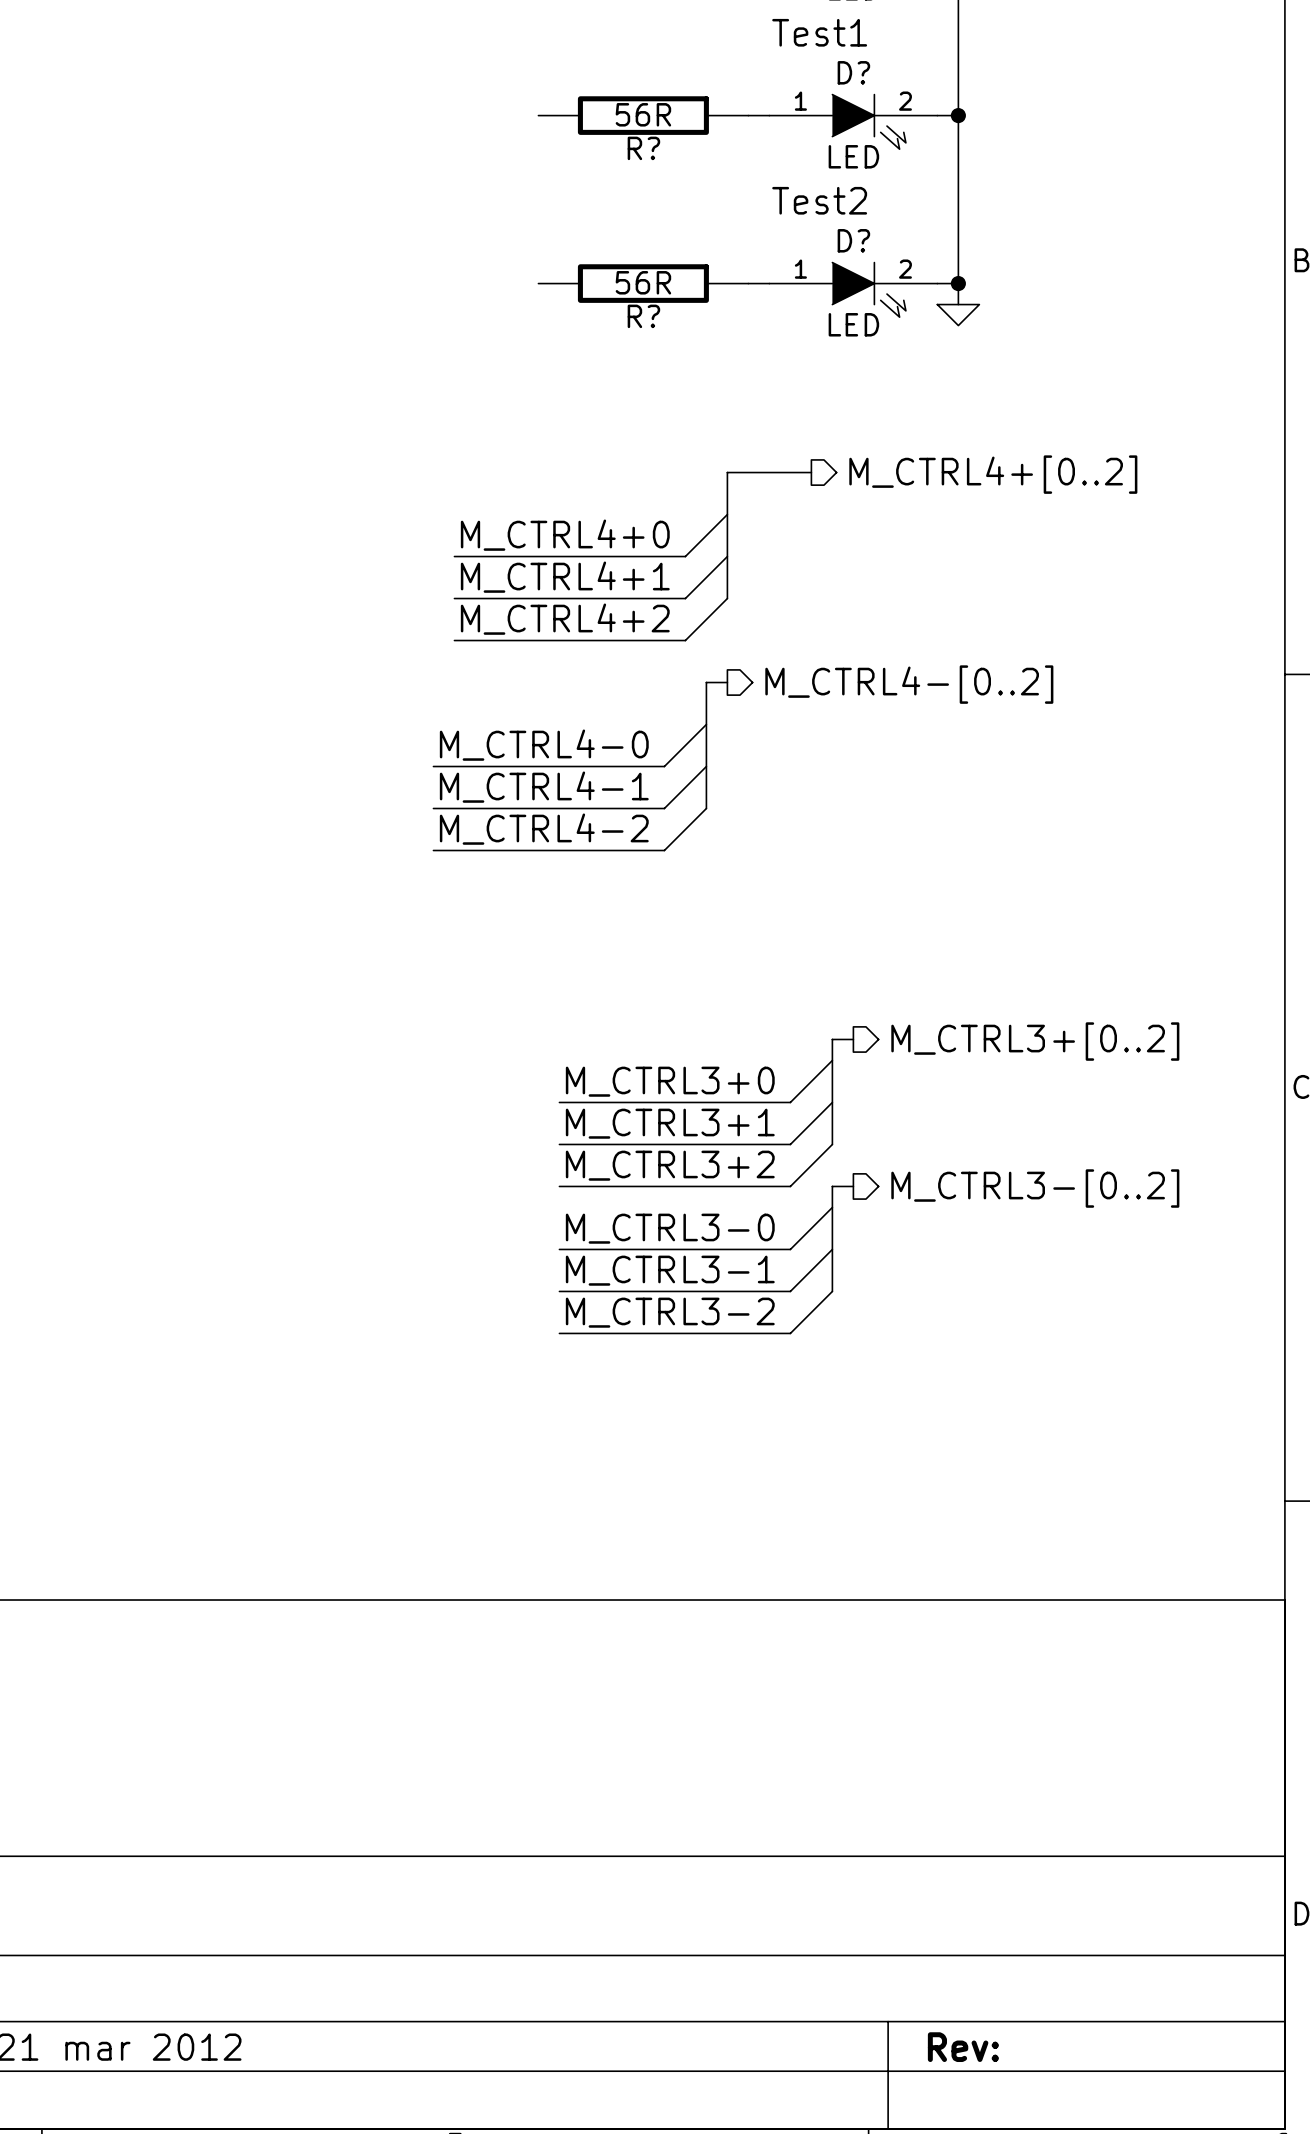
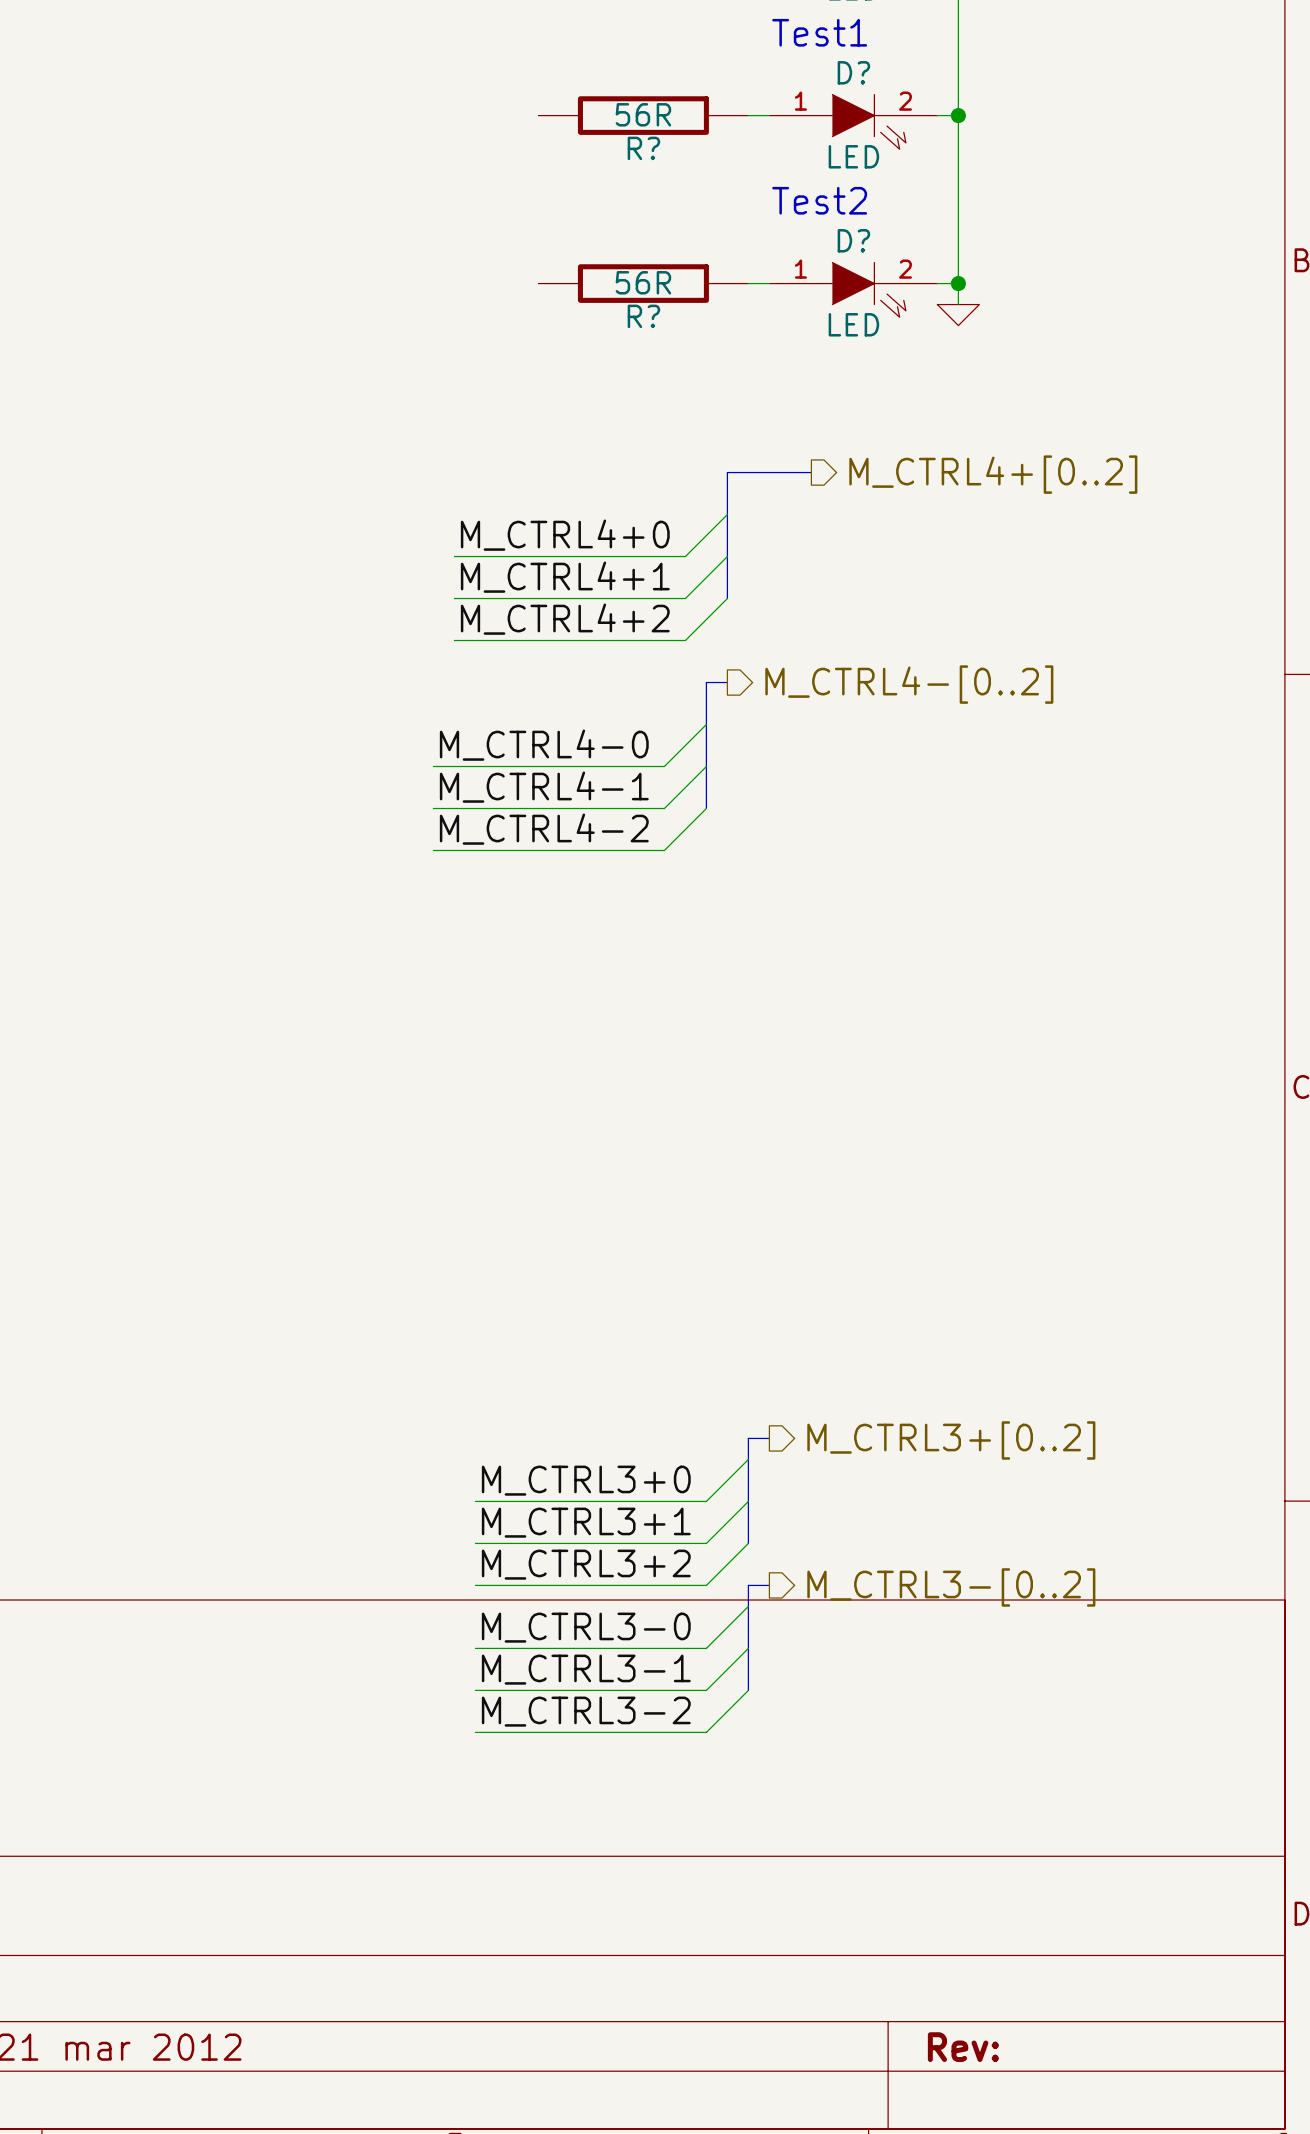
bus: (853, 1039) (832, 1039) (832, 1144) -> (769, 1438) (748, 1438) (748, 1543)
hierarchical label position: M_CTRL3+[0..2] (1035, 1041) -> M_CTRL3+[0..2] (951, 1440)
wire: (832, 1060) (790, 1102) (559, 1102) -> (748, 1459) (706, 1501) (475, 1501)
label position: M_CTRL3+0 (670, 1081) -> M_CTRL3+0 (586, 1480)
wire: (832, 1102) (790, 1144) (559, 1144) -> (748, 1501) (706, 1543) (475, 1543)
label position: M_CTRL3+1 (670, 1123) -> M_CTRL3+1 (586, 1522)
wire: (832, 1144) (790, 1186) (559, 1186) -> (748, 1543) (706, 1585) (475, 1585)
label position: M_CTRL3+2 (670, 1165) -> M_CTRL3+2 (586, 1564)
bus: (853, 1186) (832, 1186) (832, 1291) -> (769, 1585) (748, 1585) (748, 1690)
hierarchical label position: M_CTRL3-[0..2] (1035, 1188) -> M_CTRL3-[0..2] (951, 1587)
wire: (832, 1207) (790, 1249) (559, 1249) -> (748, 1606) (706, 1648) (475, 1648)
label position: M_CTRL3-0 (670, 1228) -> M_CTRL3-0 (586, 1627)
wire: (832, 1249) (790, 1291) (559, 1291) -> (748, 1648) (706, 1690) (475, 1690)
label position: M_CTRL3-1 (670, 1270) -> M_CTRL3-1 (586, 1669)
wire: (832, 1291) (790, 1333) (559, 1333) -> (748, 1690) (706, 1732) (475, 1732)
label position: M_CTRL3-2 (670, 1312) -> M_CTRL3-2 (586, 1711)

